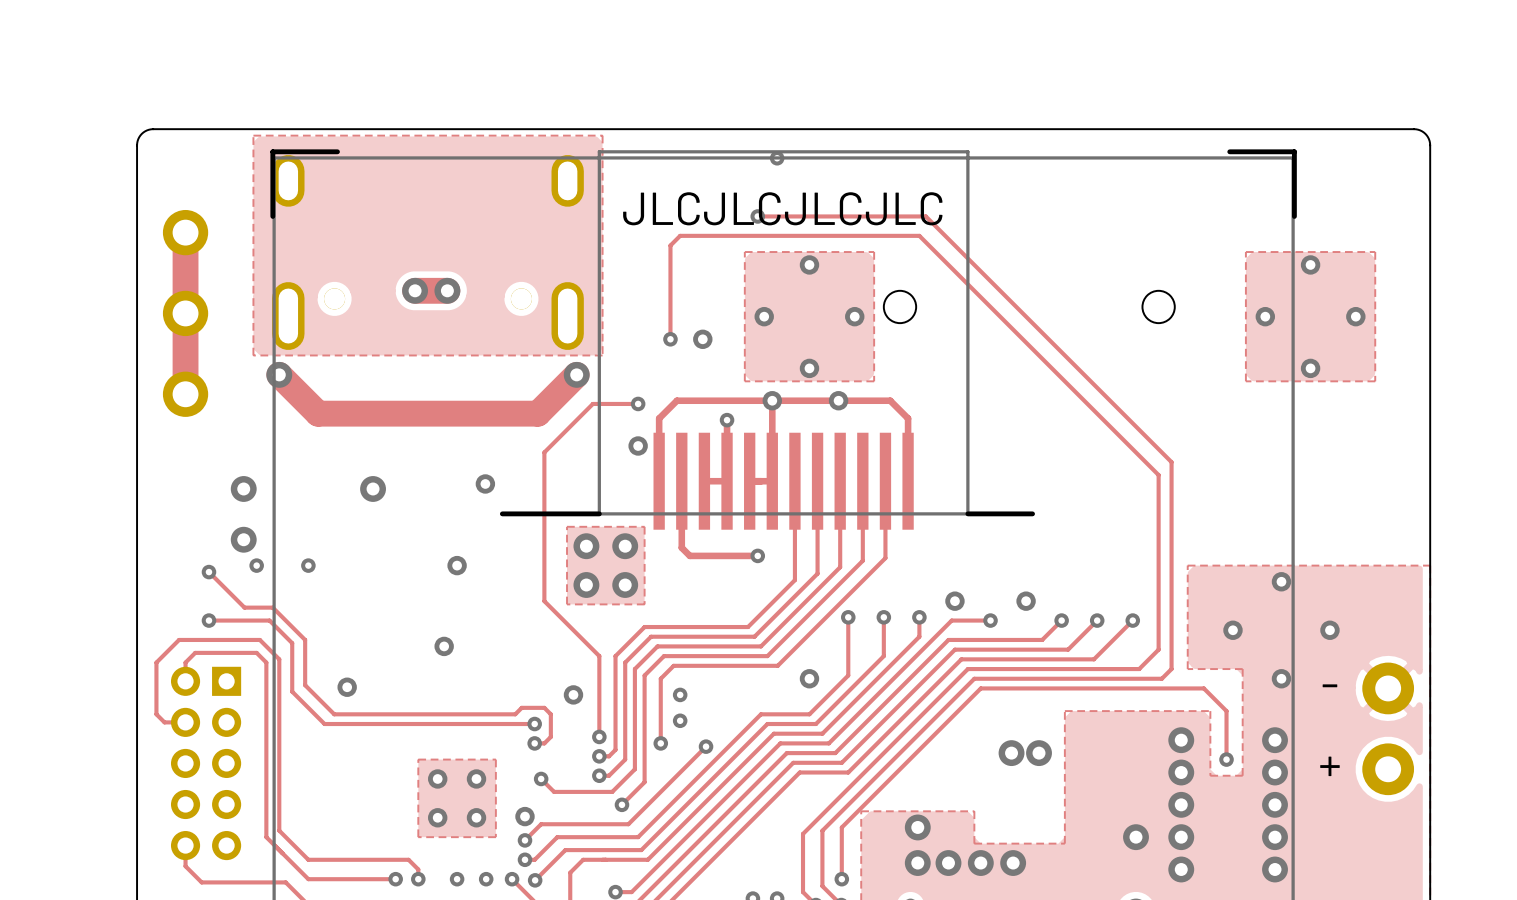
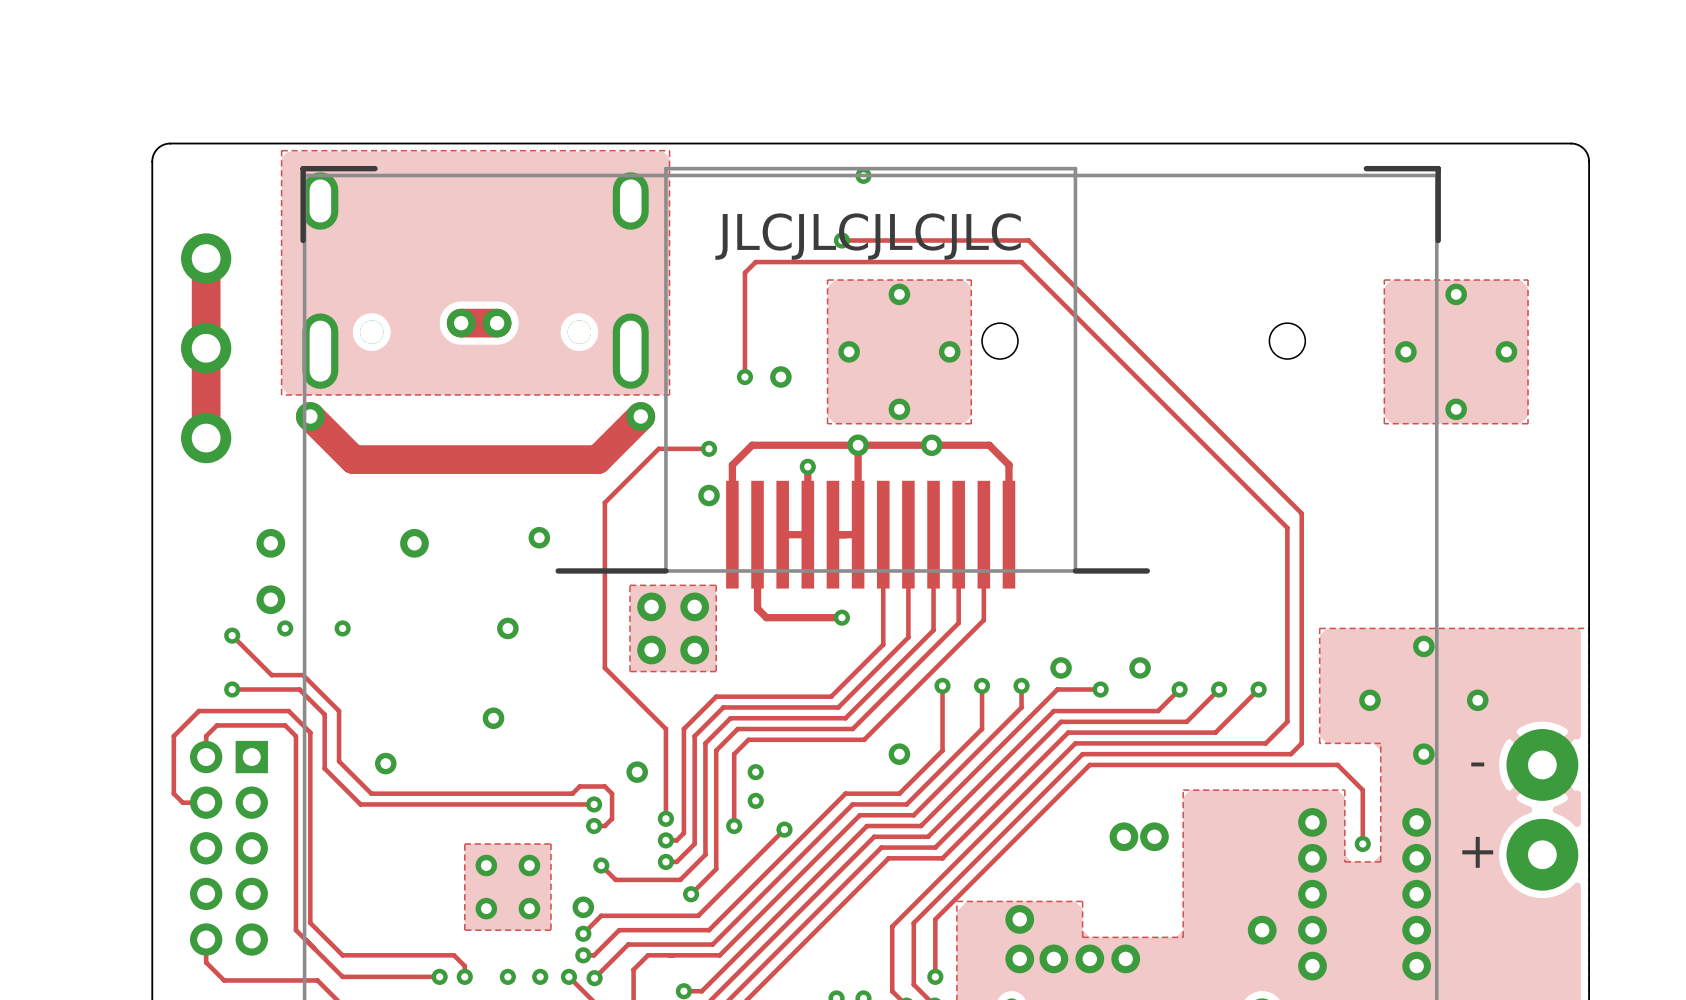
part footprint: [1362, 662, 1415, 715] -> [1506, 729, 1579, 801]
part footprint: [1362, 743, 1415, 796] -> [1506, 818, 1579, 891]

